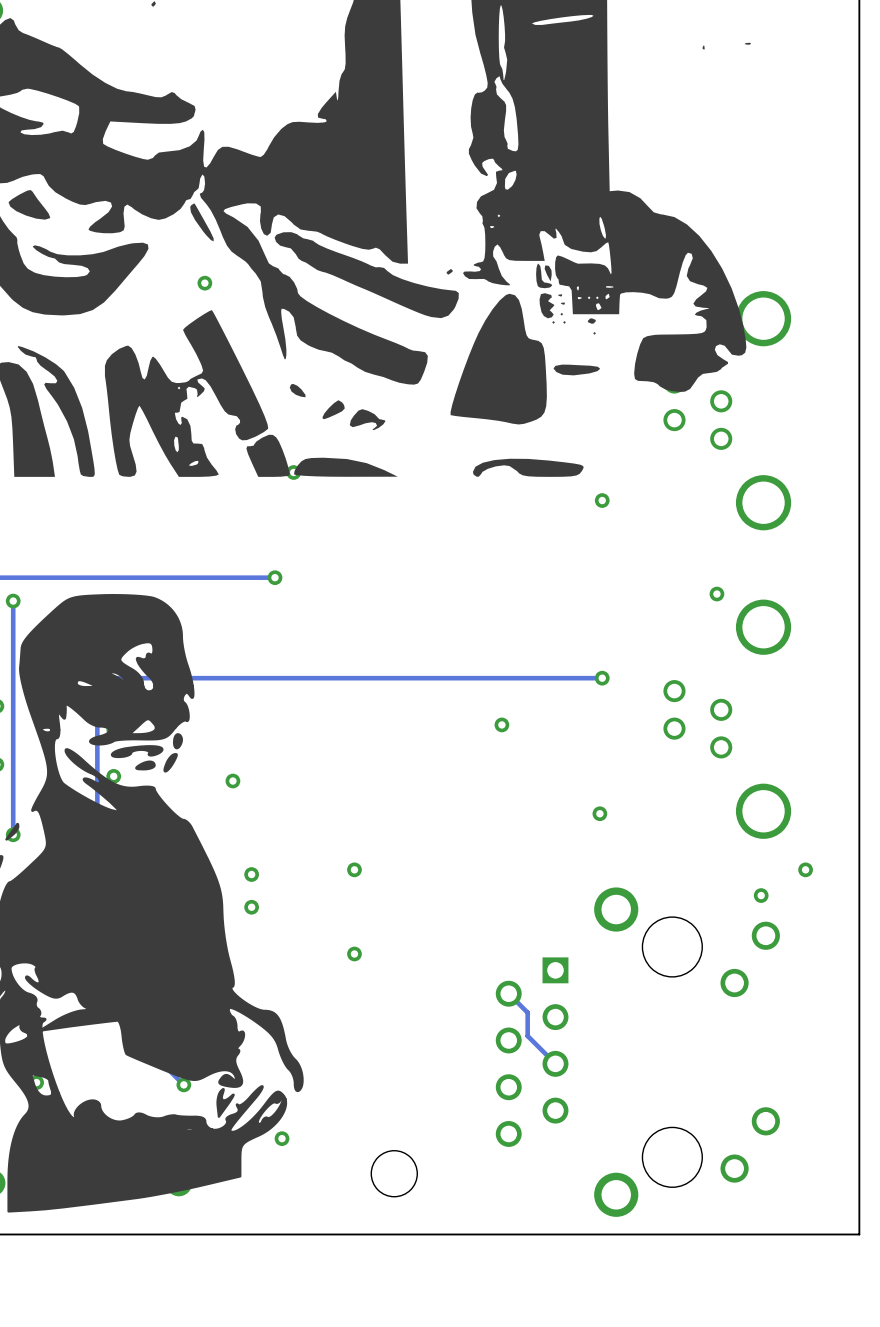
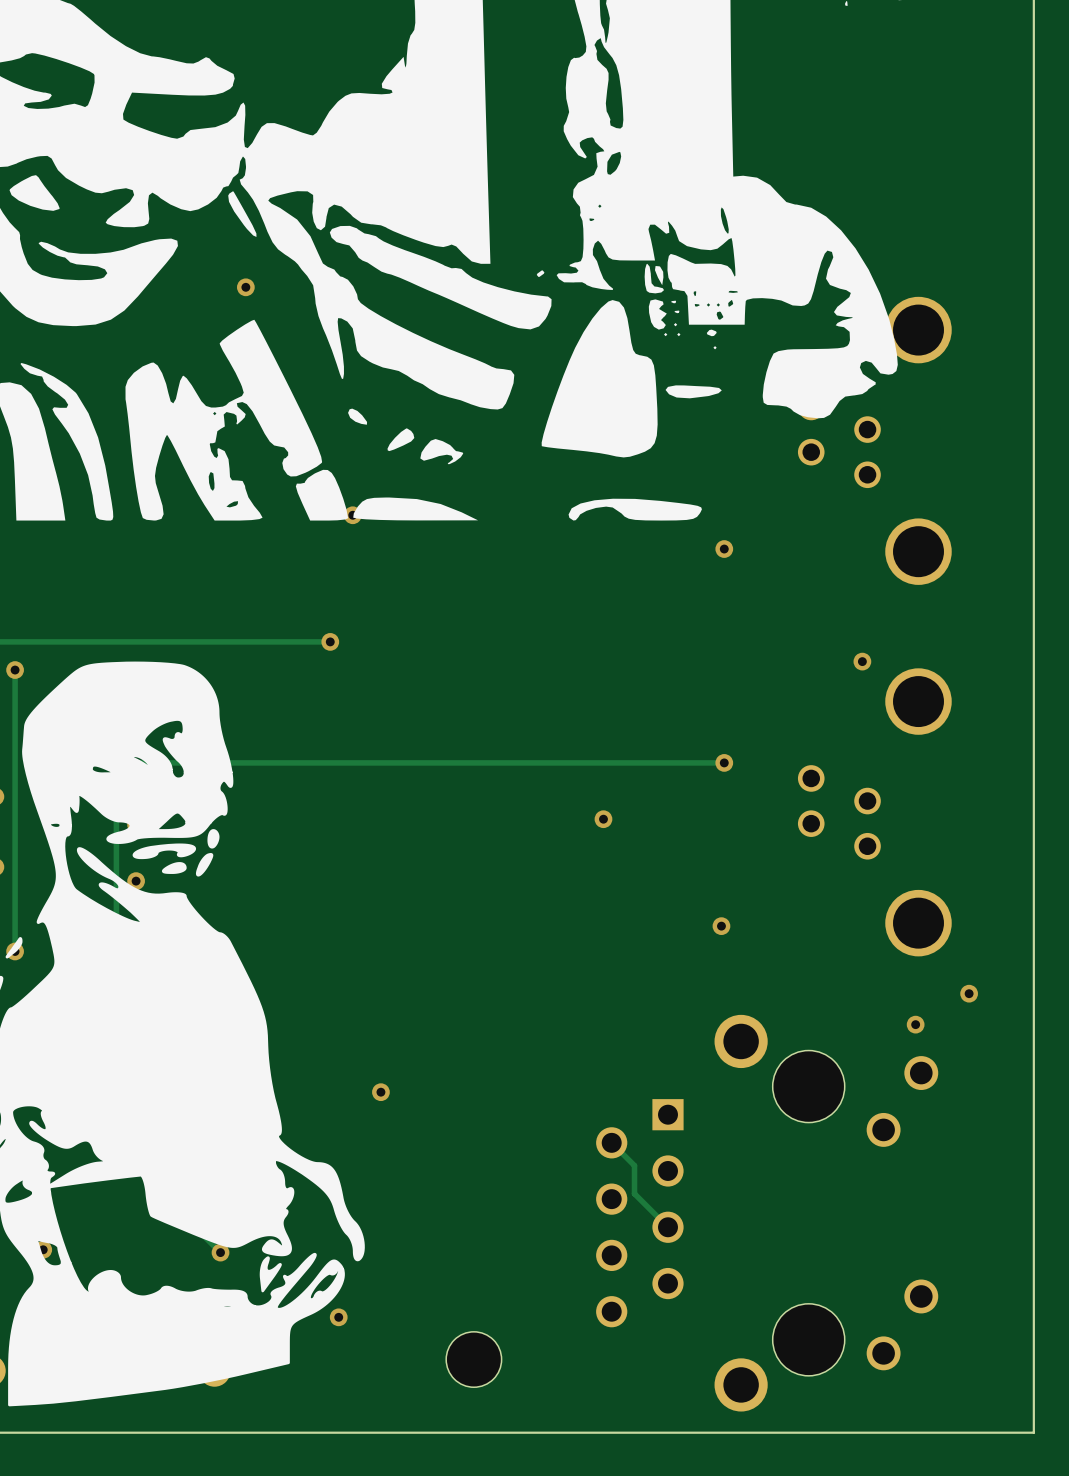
via: (232, 781) -> none
via: (354, 869) -> none
via: (251, 874) -> none
via: (251, 907) -> none
via position: (354, 953) -> (380, 1092)

